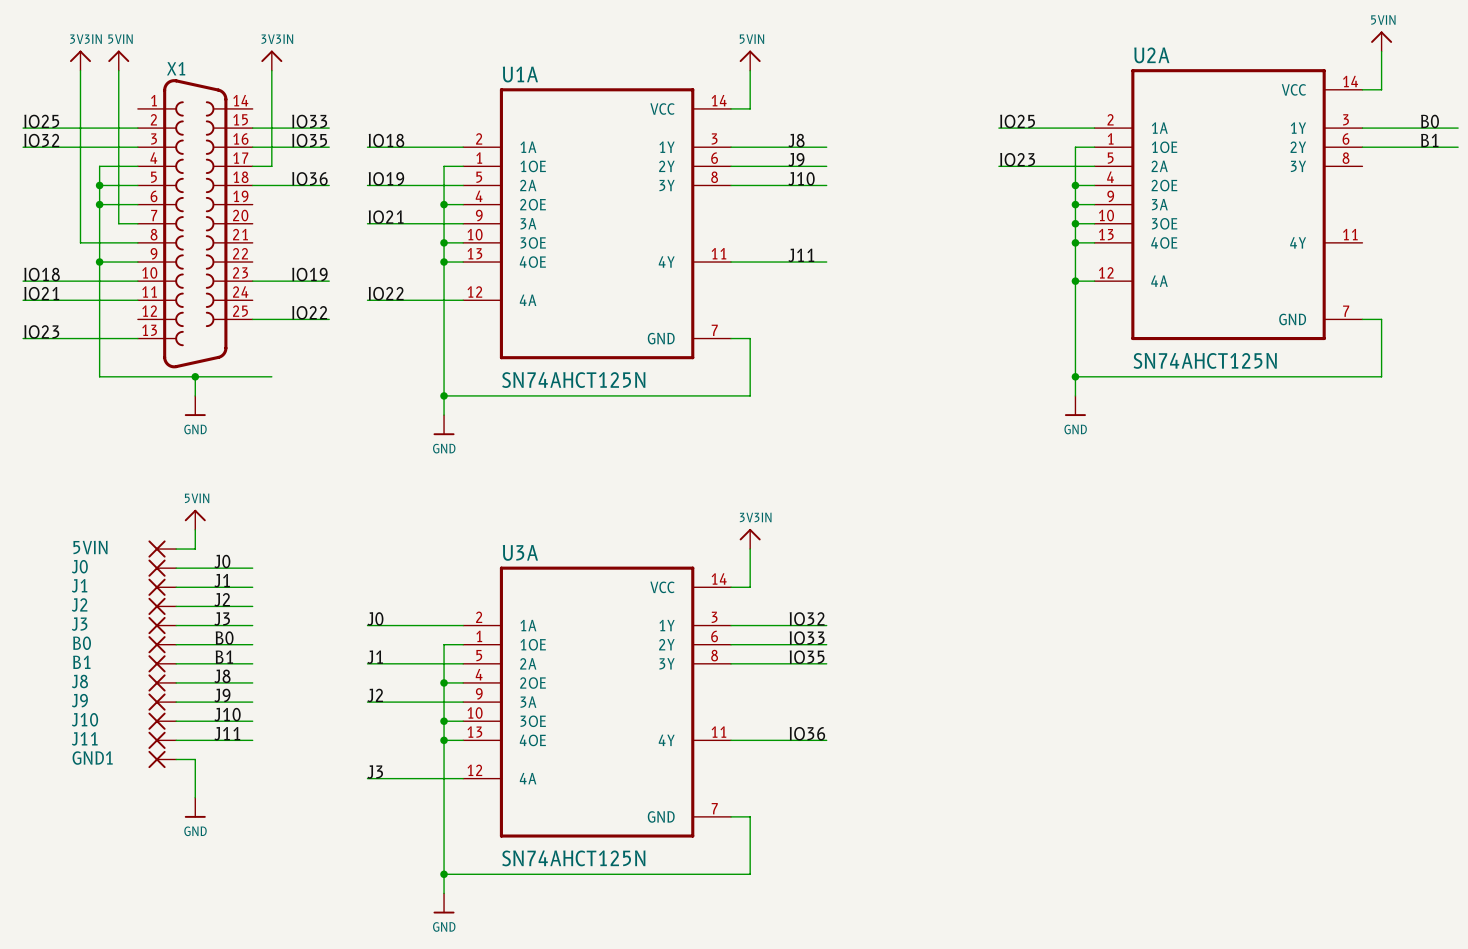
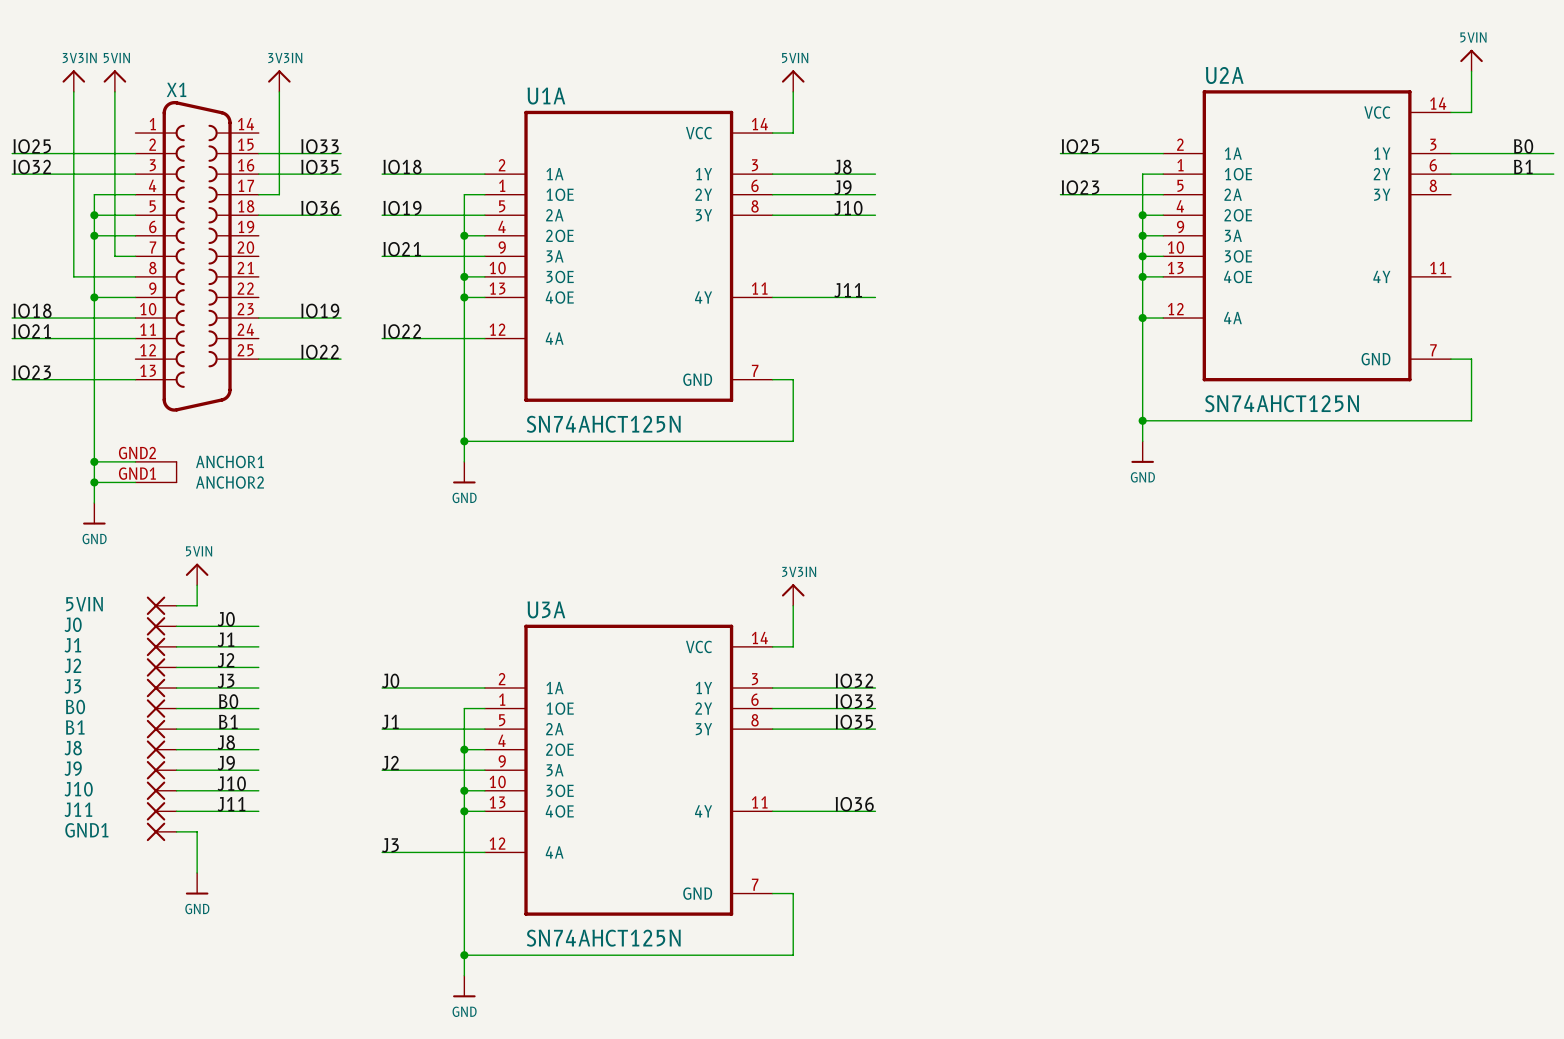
X1 symbol: [137, 79, 253, 369] -> [135, 100, 259, 484]
wire: (99, 376) (271, 376) -> (94, 420) (94, 503)
wire: (195, 376) (195, 395) -> none
junction: (195, 376) -> none
power symbol position: GND (195, 405) -> GND (94, 513)
wire: none -> (94, 461) (135, 461)
junction: none -> (94, 461)
wire: none -> (94, 482) (135, 482)
junction: none -> (94, 482)

